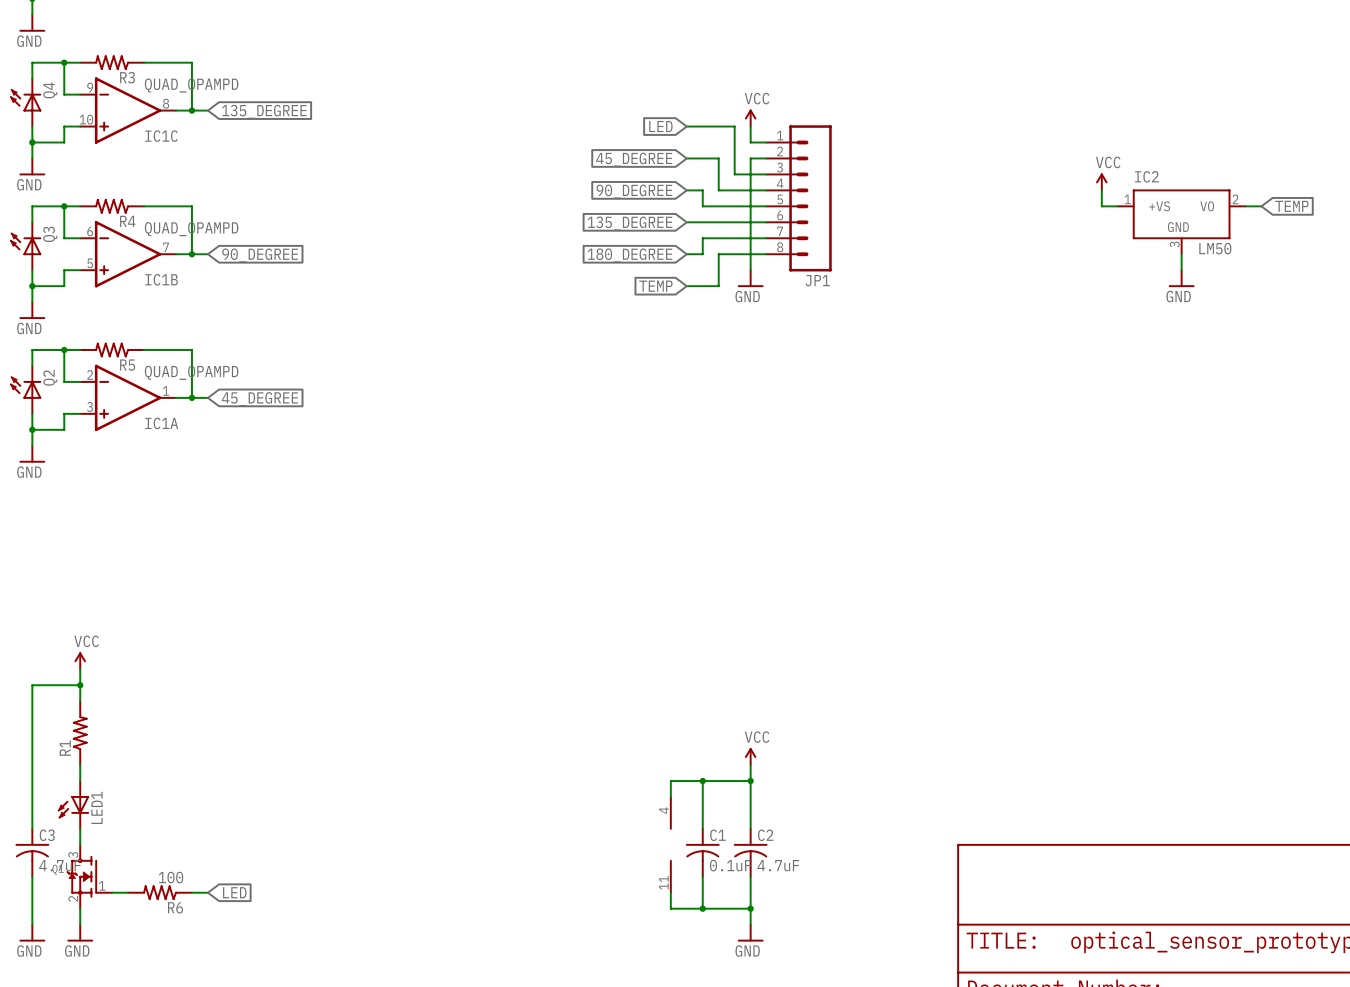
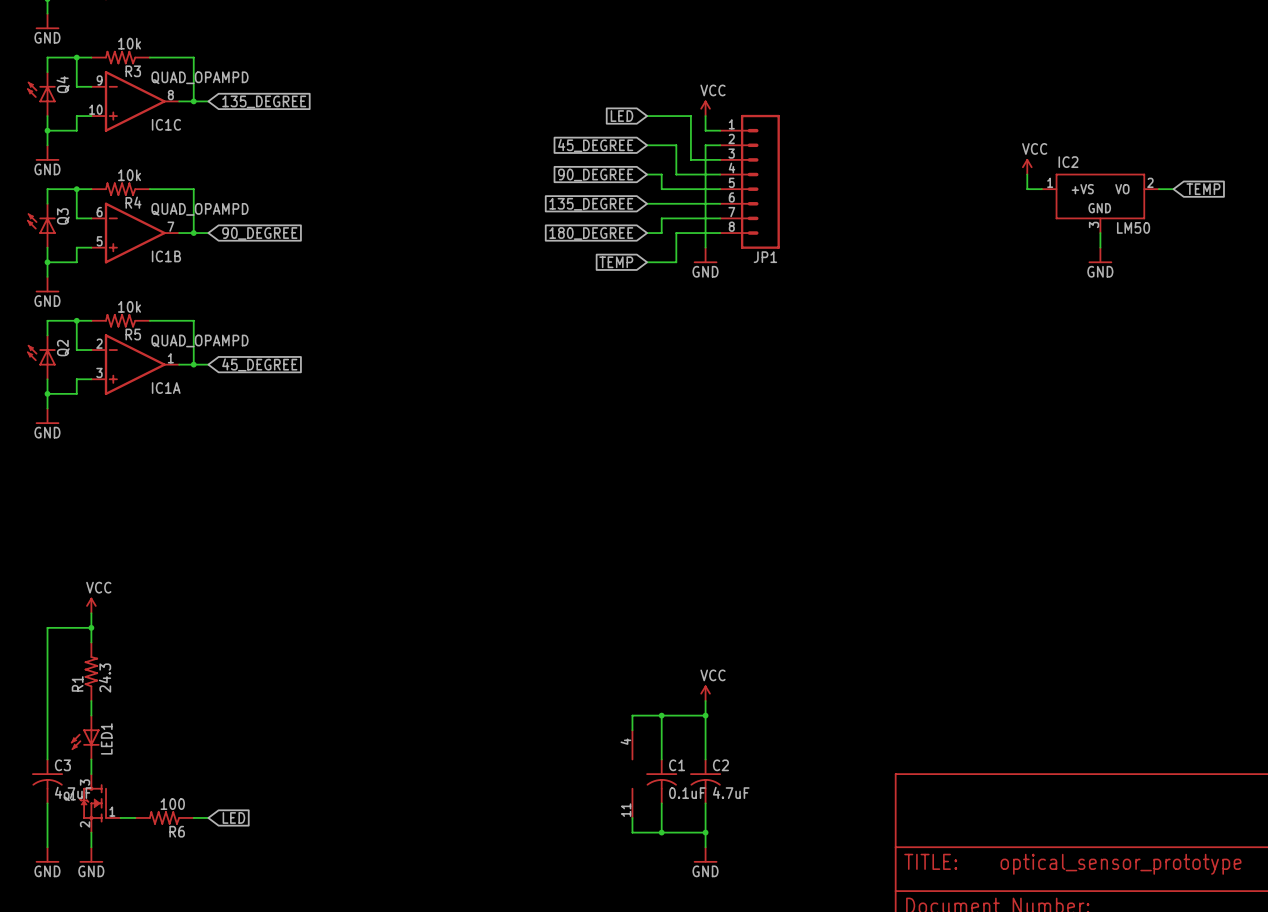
R3 value: none -> 10k (129, 43)
R4 value: none -> 10k (129, 175)
R5 value: none -> 10k (129, 306)
R1 value: none -> 24.3 (105, 678)

